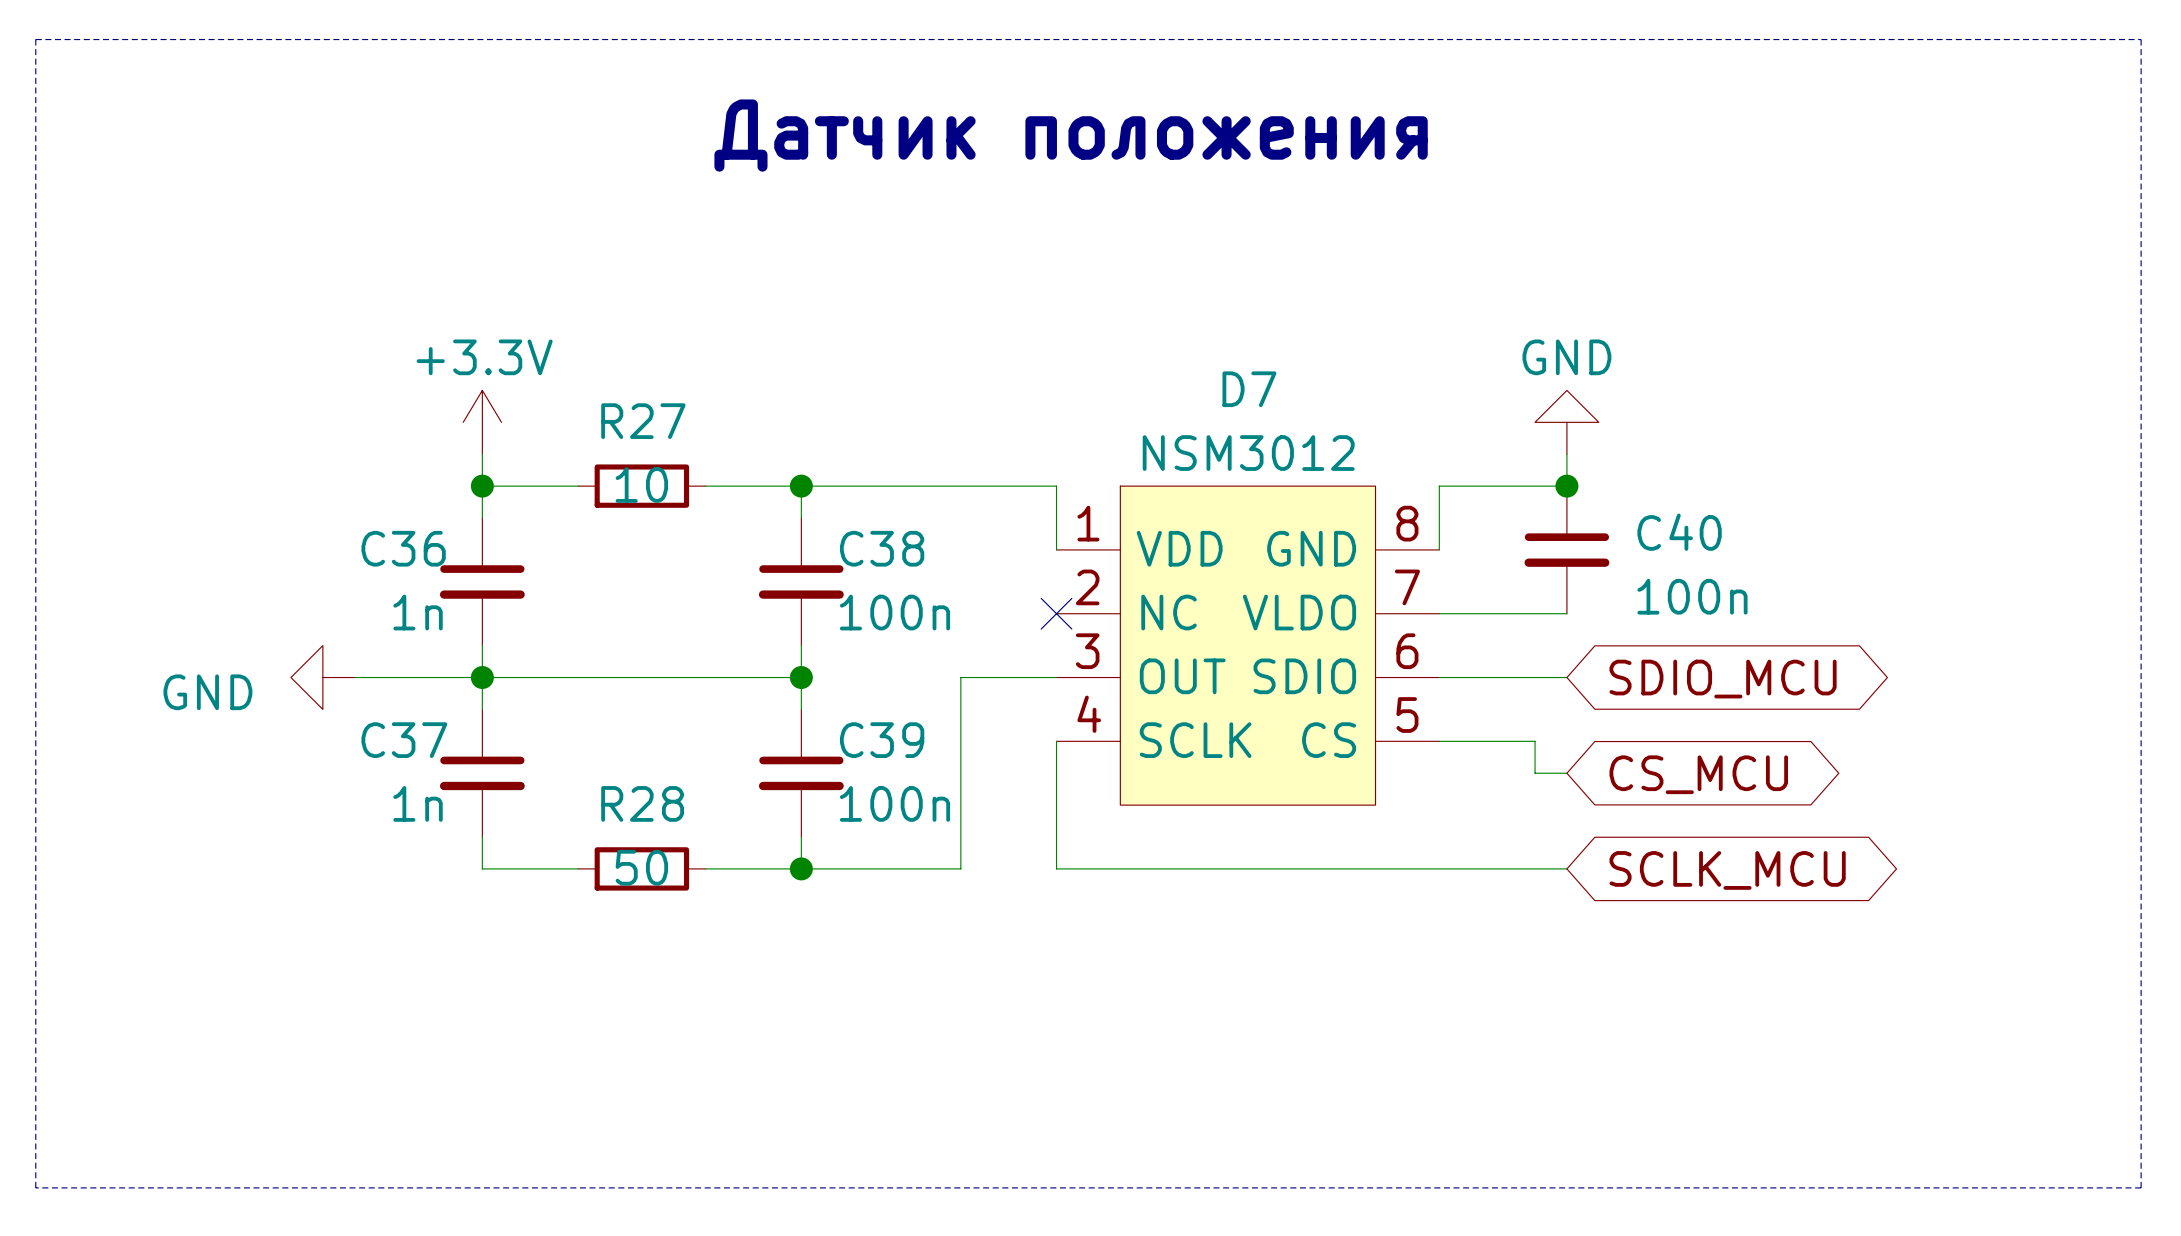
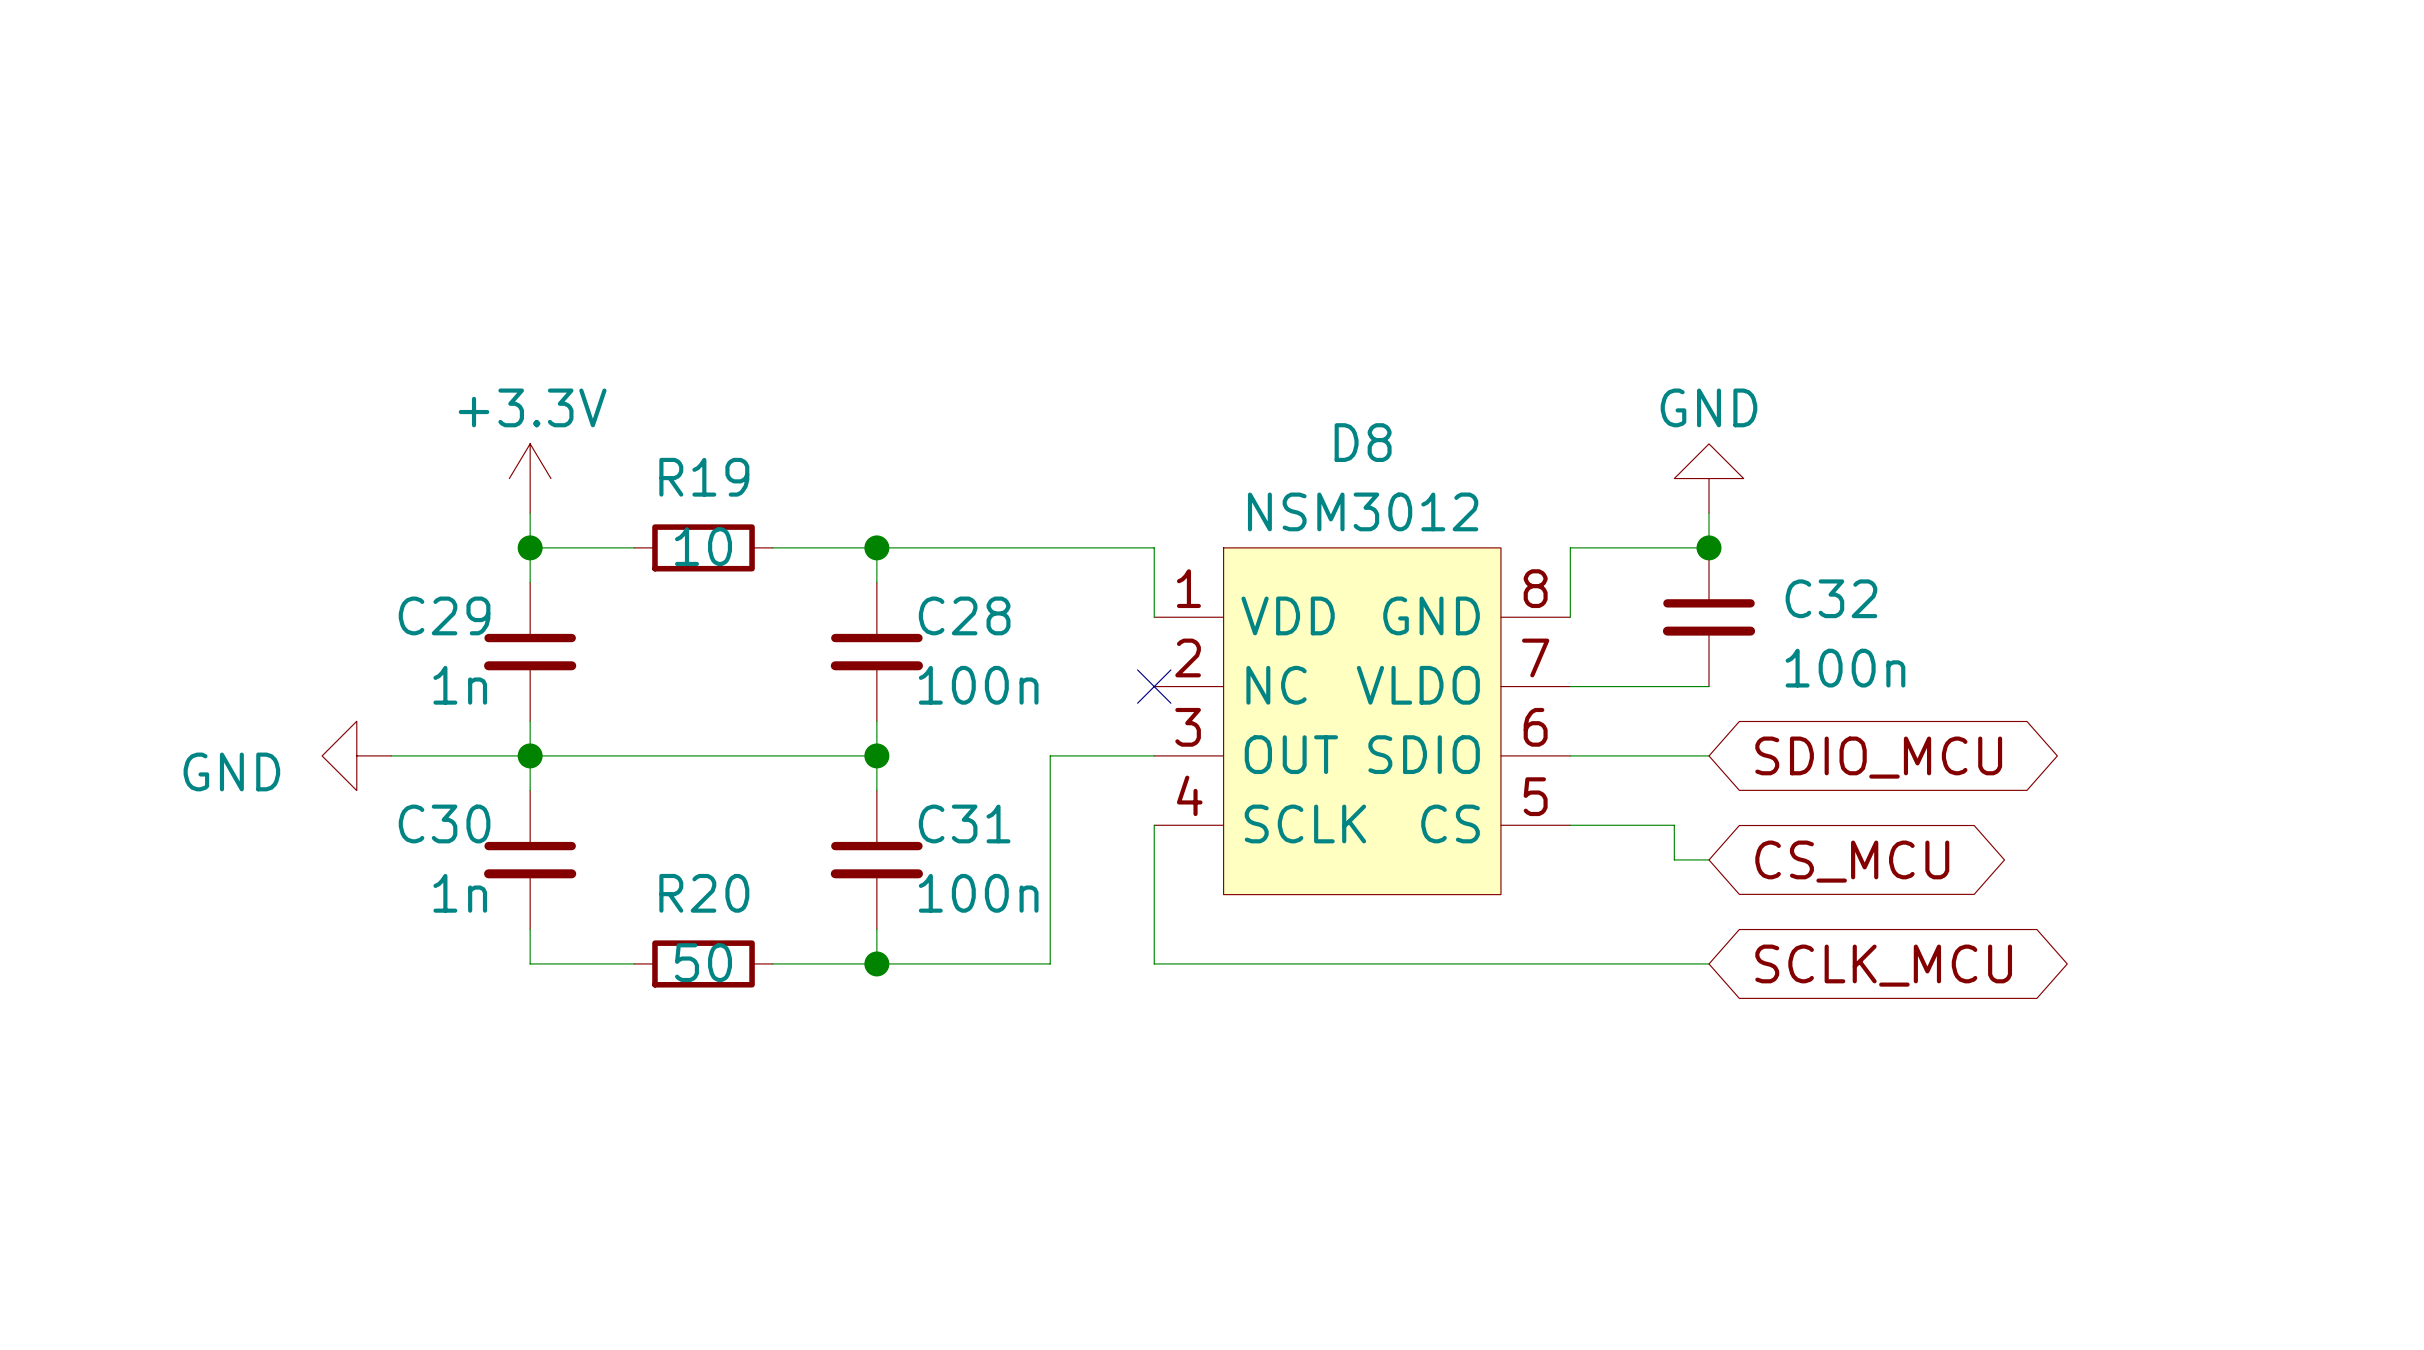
line: (35, 39) (2141, 39) (2141, 1187) (35, 1187) (35, 39) -> none
text: Датчик положения (1071, 135) -> none
D7 name: D7 (1249, 389) -> D8 (1363, 442)
R27 name: R27 (643, 421) -> R19 (704, 477)
C40 name: C40 (1679, 532) -> C32 (1831, 598)
C36 name: C36 (403, 548) -> C29 (444, 615)
C38 name: C38 (882, 548) -> C28 (964, 615)
C37 name: C37 (404, 740) -> C30 (444, 823)
C39 name: C39 (882, 740) -> C31 (964, 823)
R28 name: R28 (642, 803) -> R20 (704, 893)

